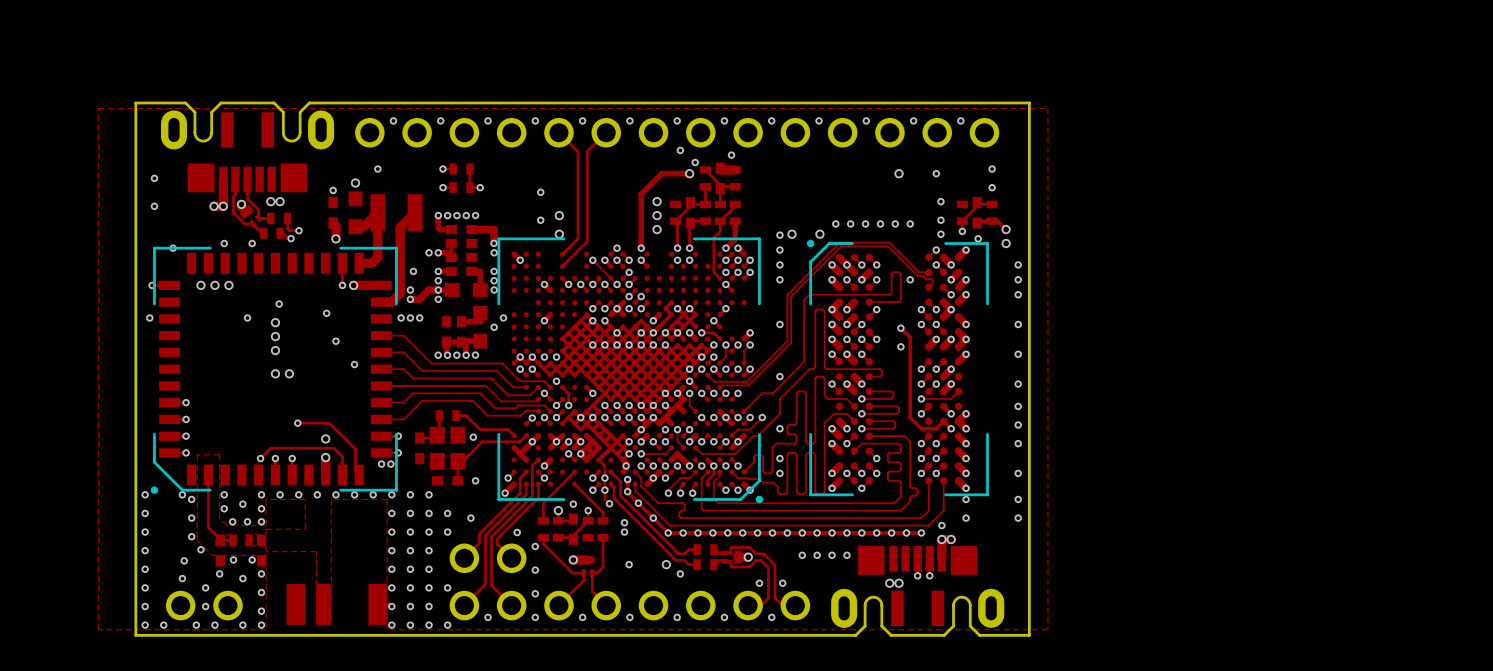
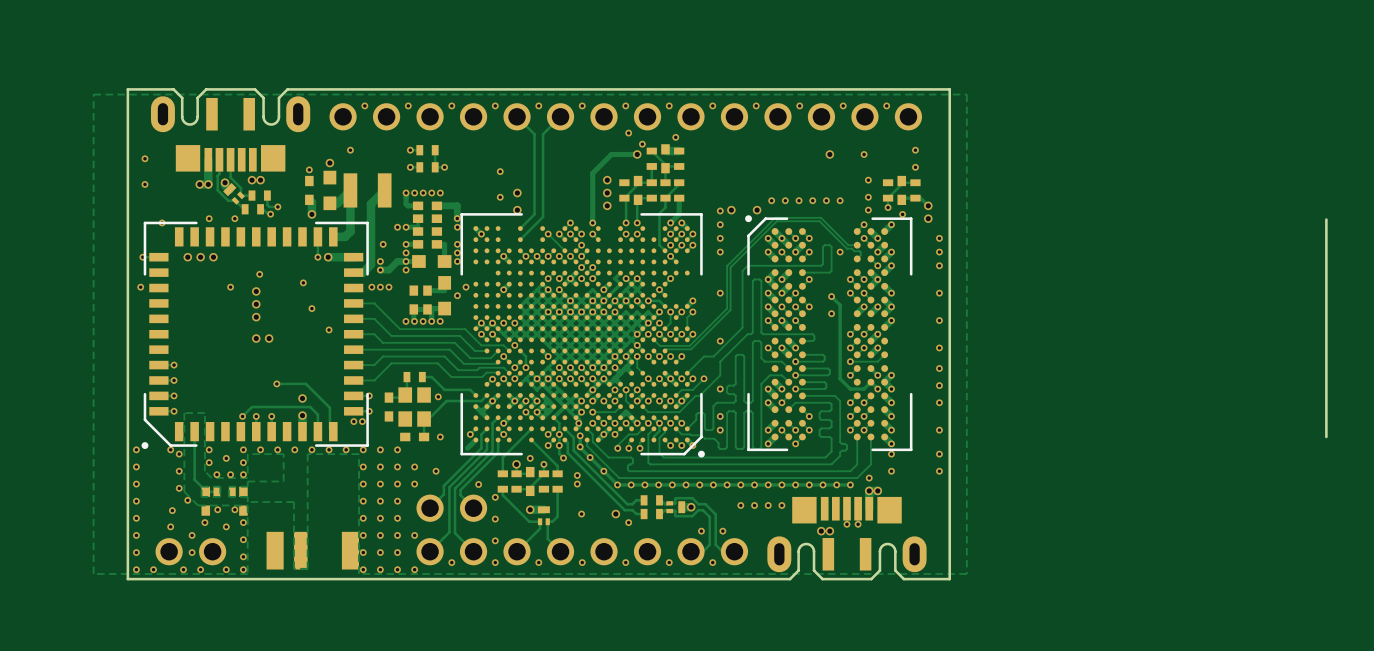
board edge: none -> (1326, 219) (1326, 436)
via: (505, 493) -> none

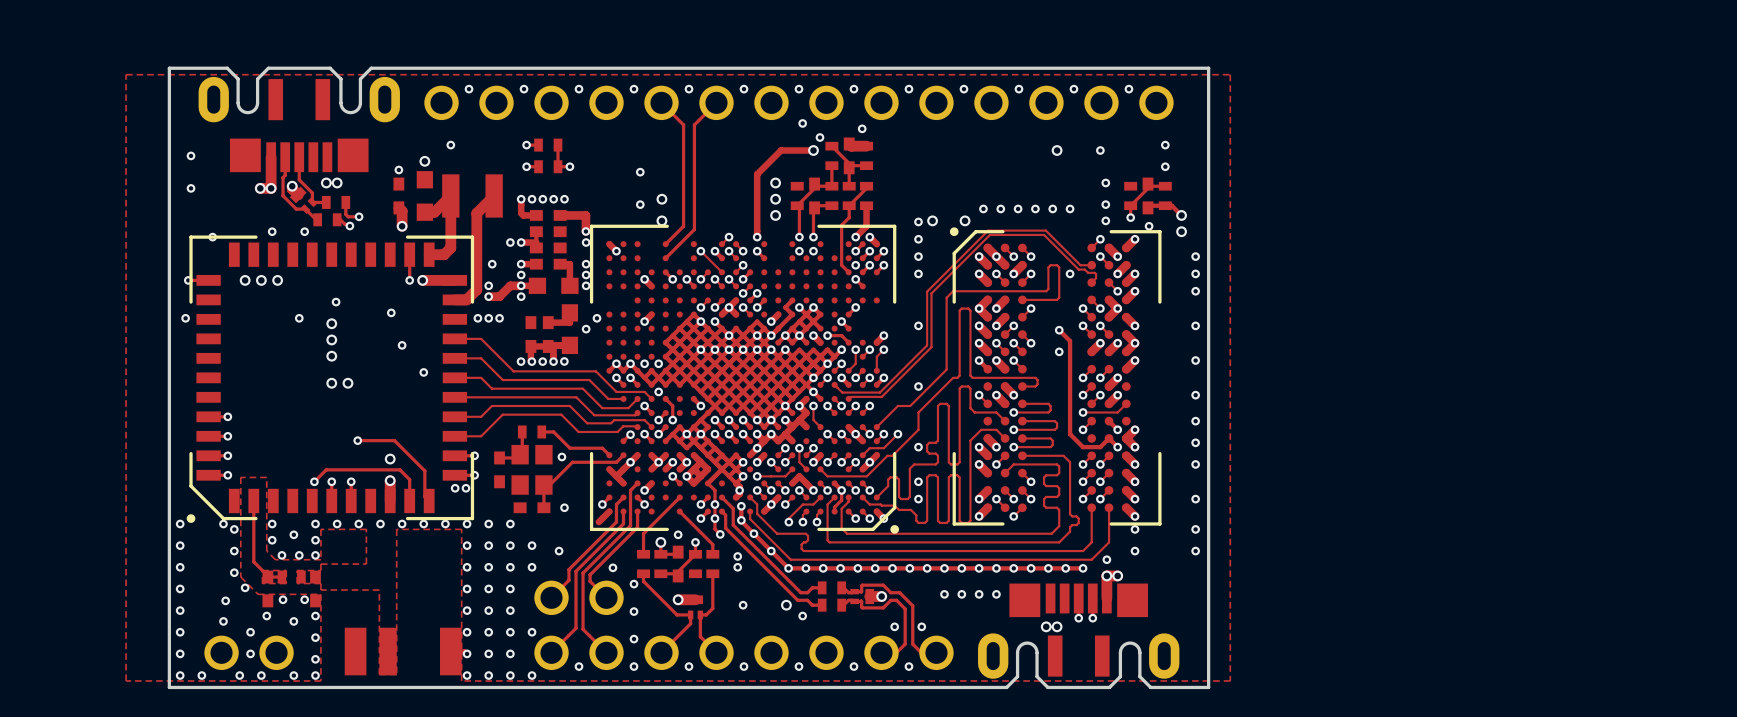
board edge: (1326, 219) (1326, 436) -> none

